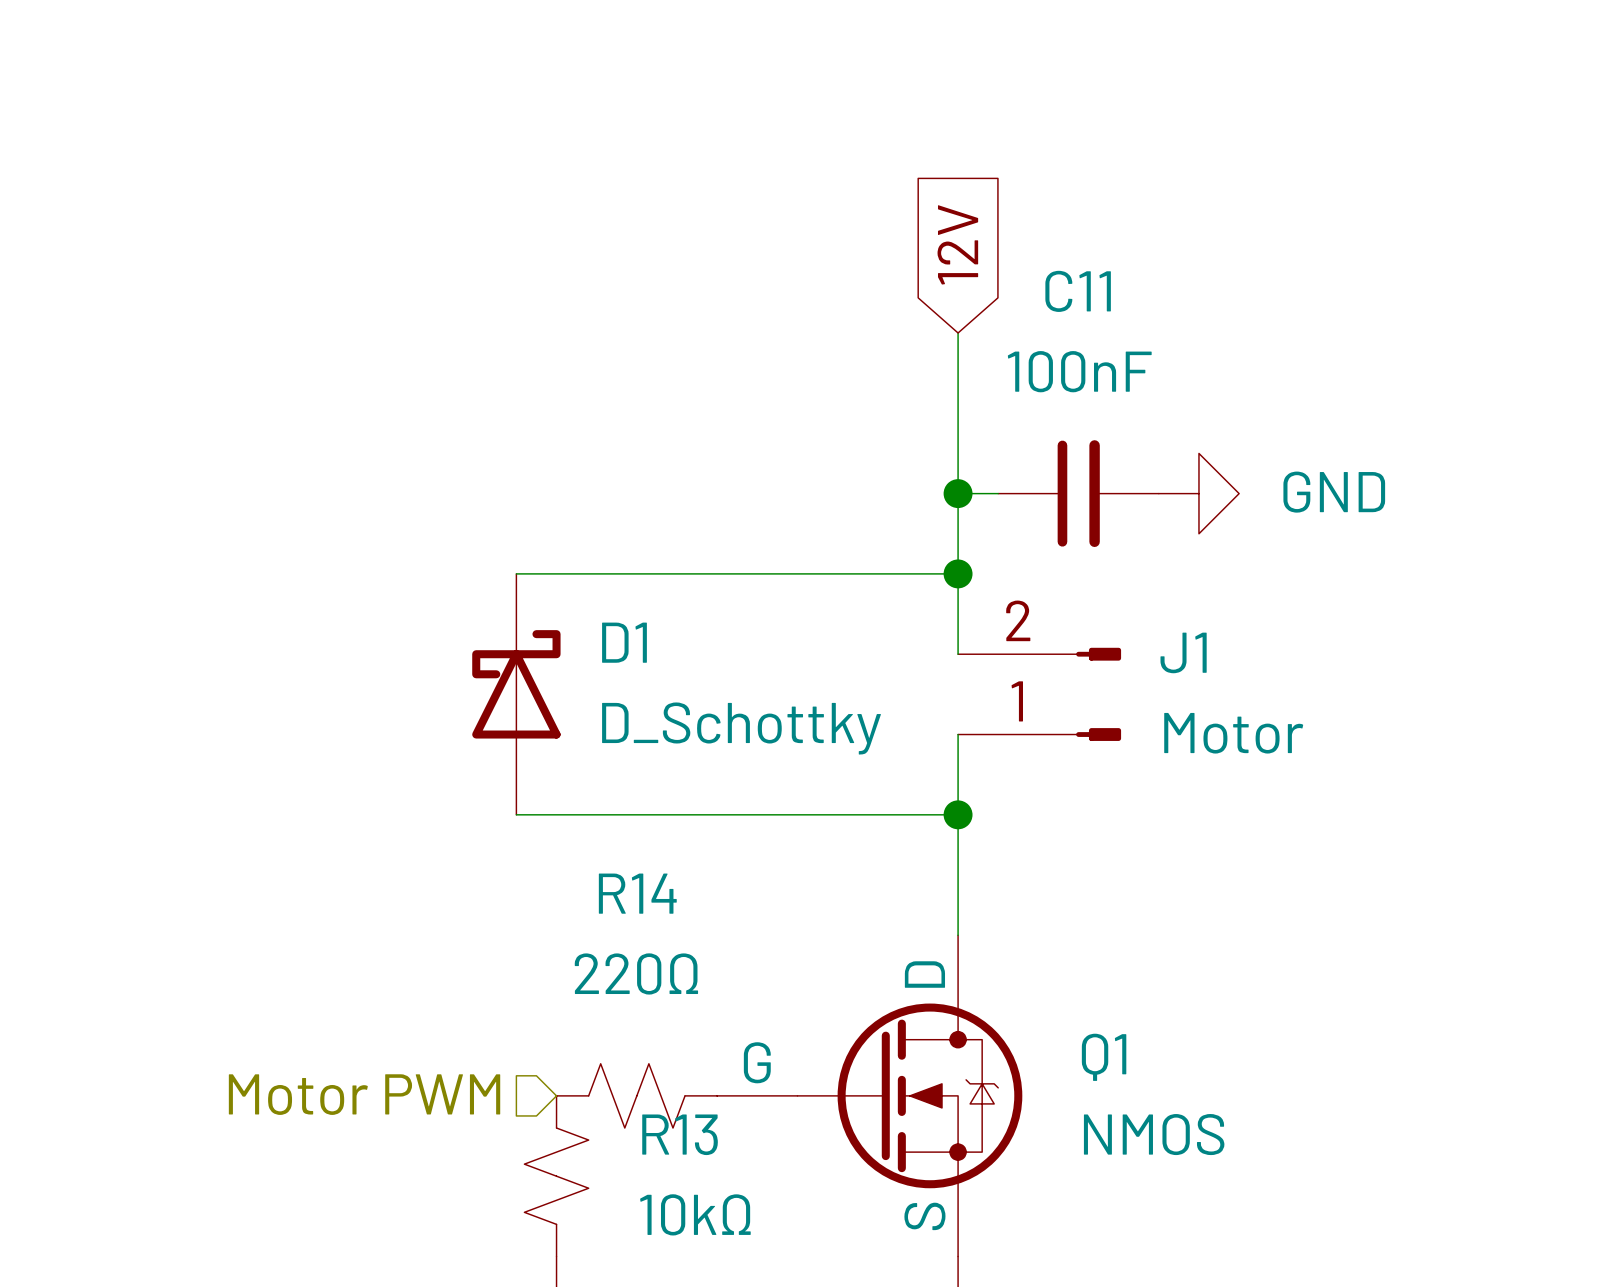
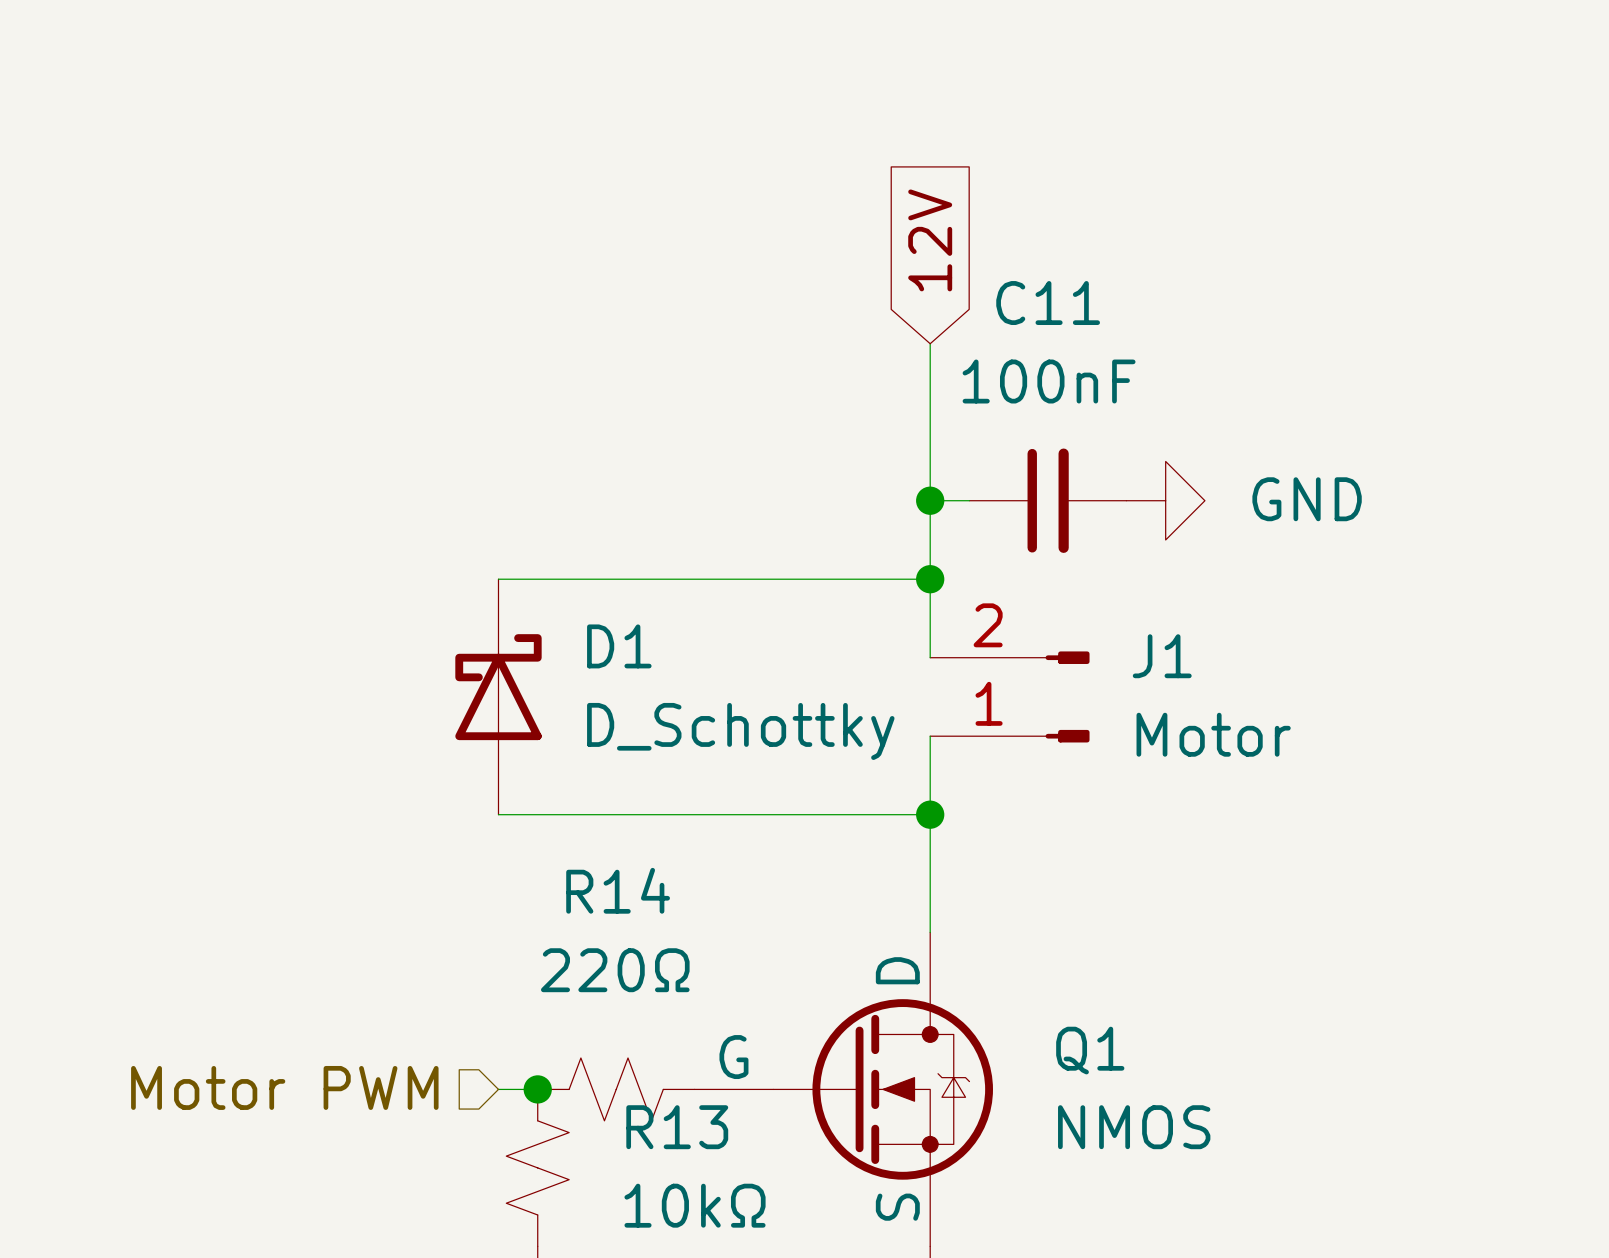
hierarchical label position: Motor PWM (364, 1094) -> Motor PWM (284, 1087)
wire: none -> (498, 1089) (537, 1089)
junction: none -> (537, 1089)

